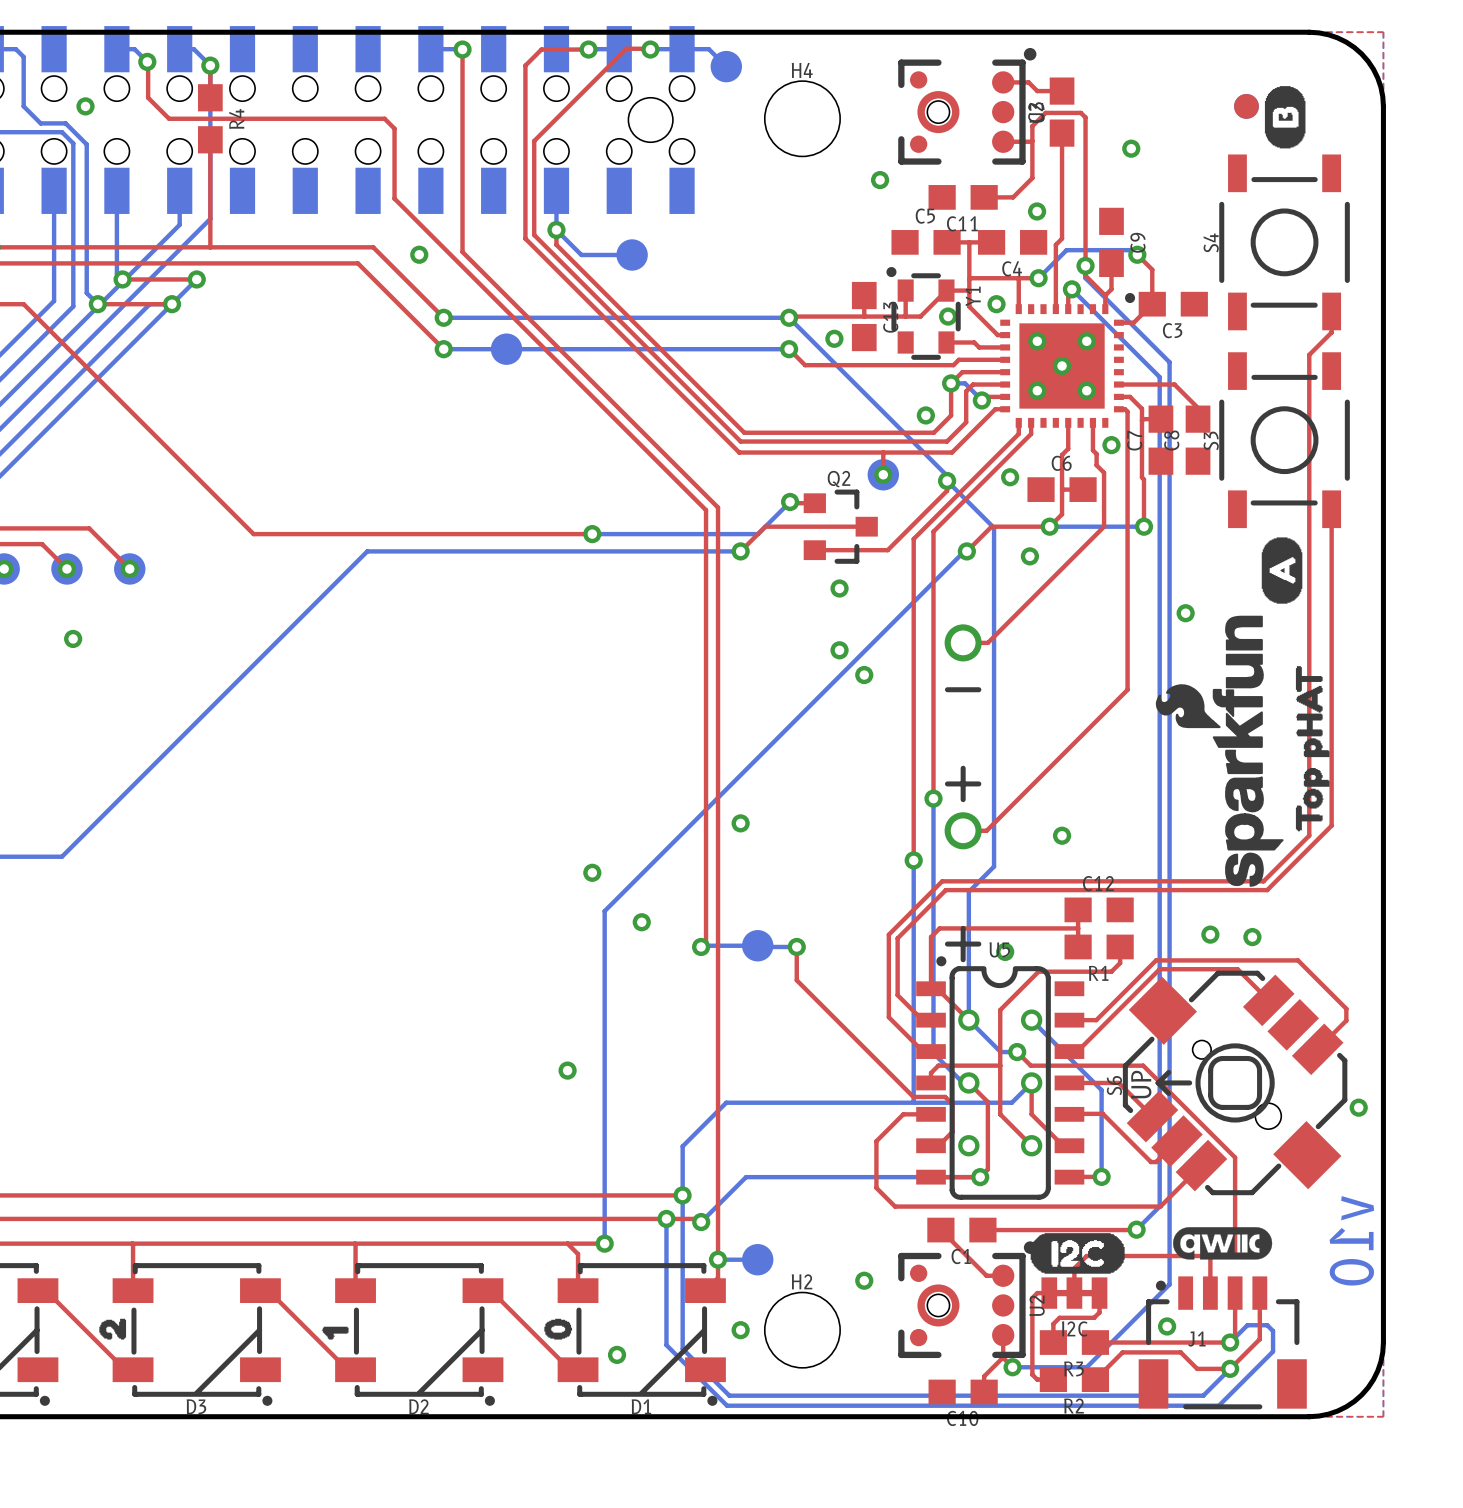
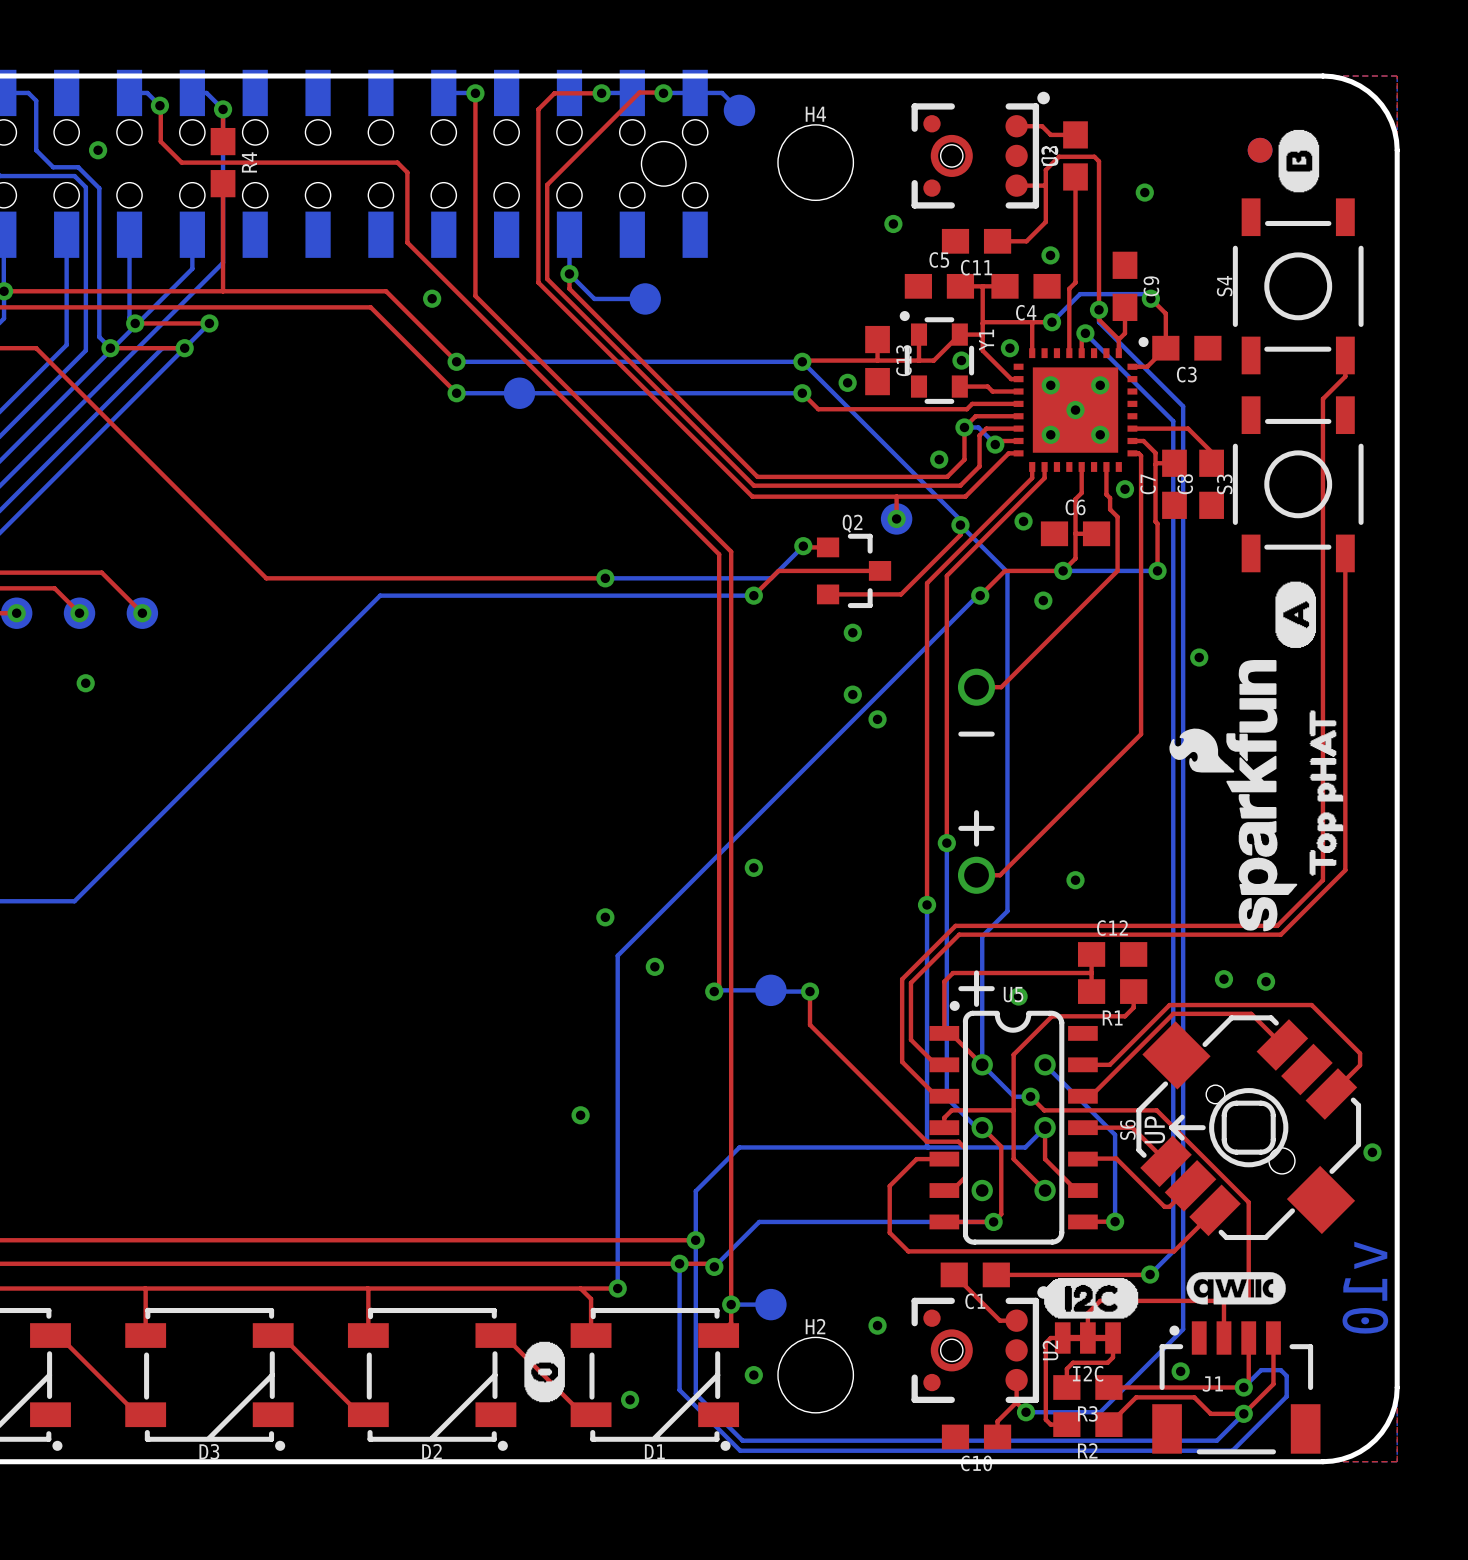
drawing: none -> [524, 1341, 565, 1403]
drawing: [99, 1318, 127, 1340] -> none
drawing: [544, 1318, 573, 1340] -> none
drawing: [321, 1326, 349, 1340] -> none

